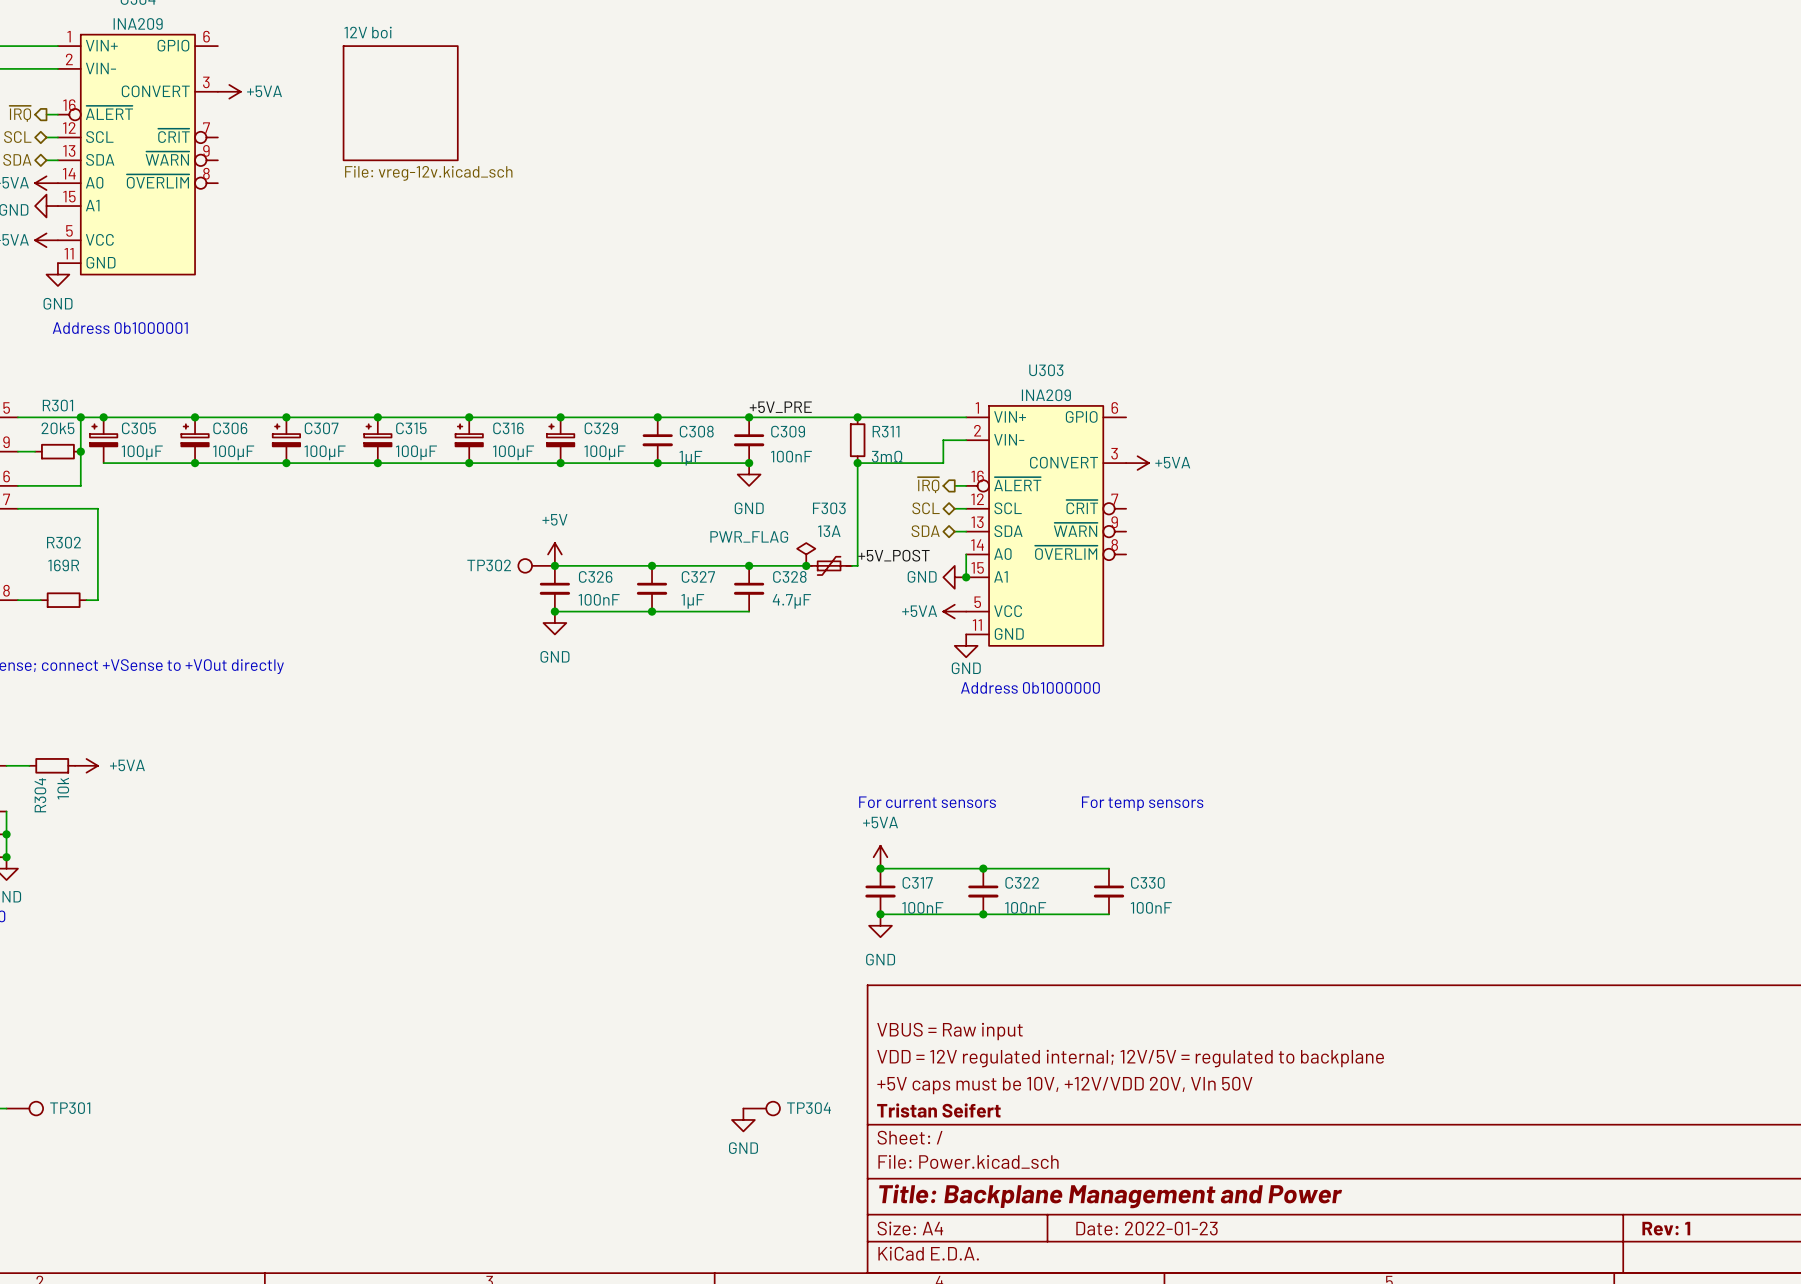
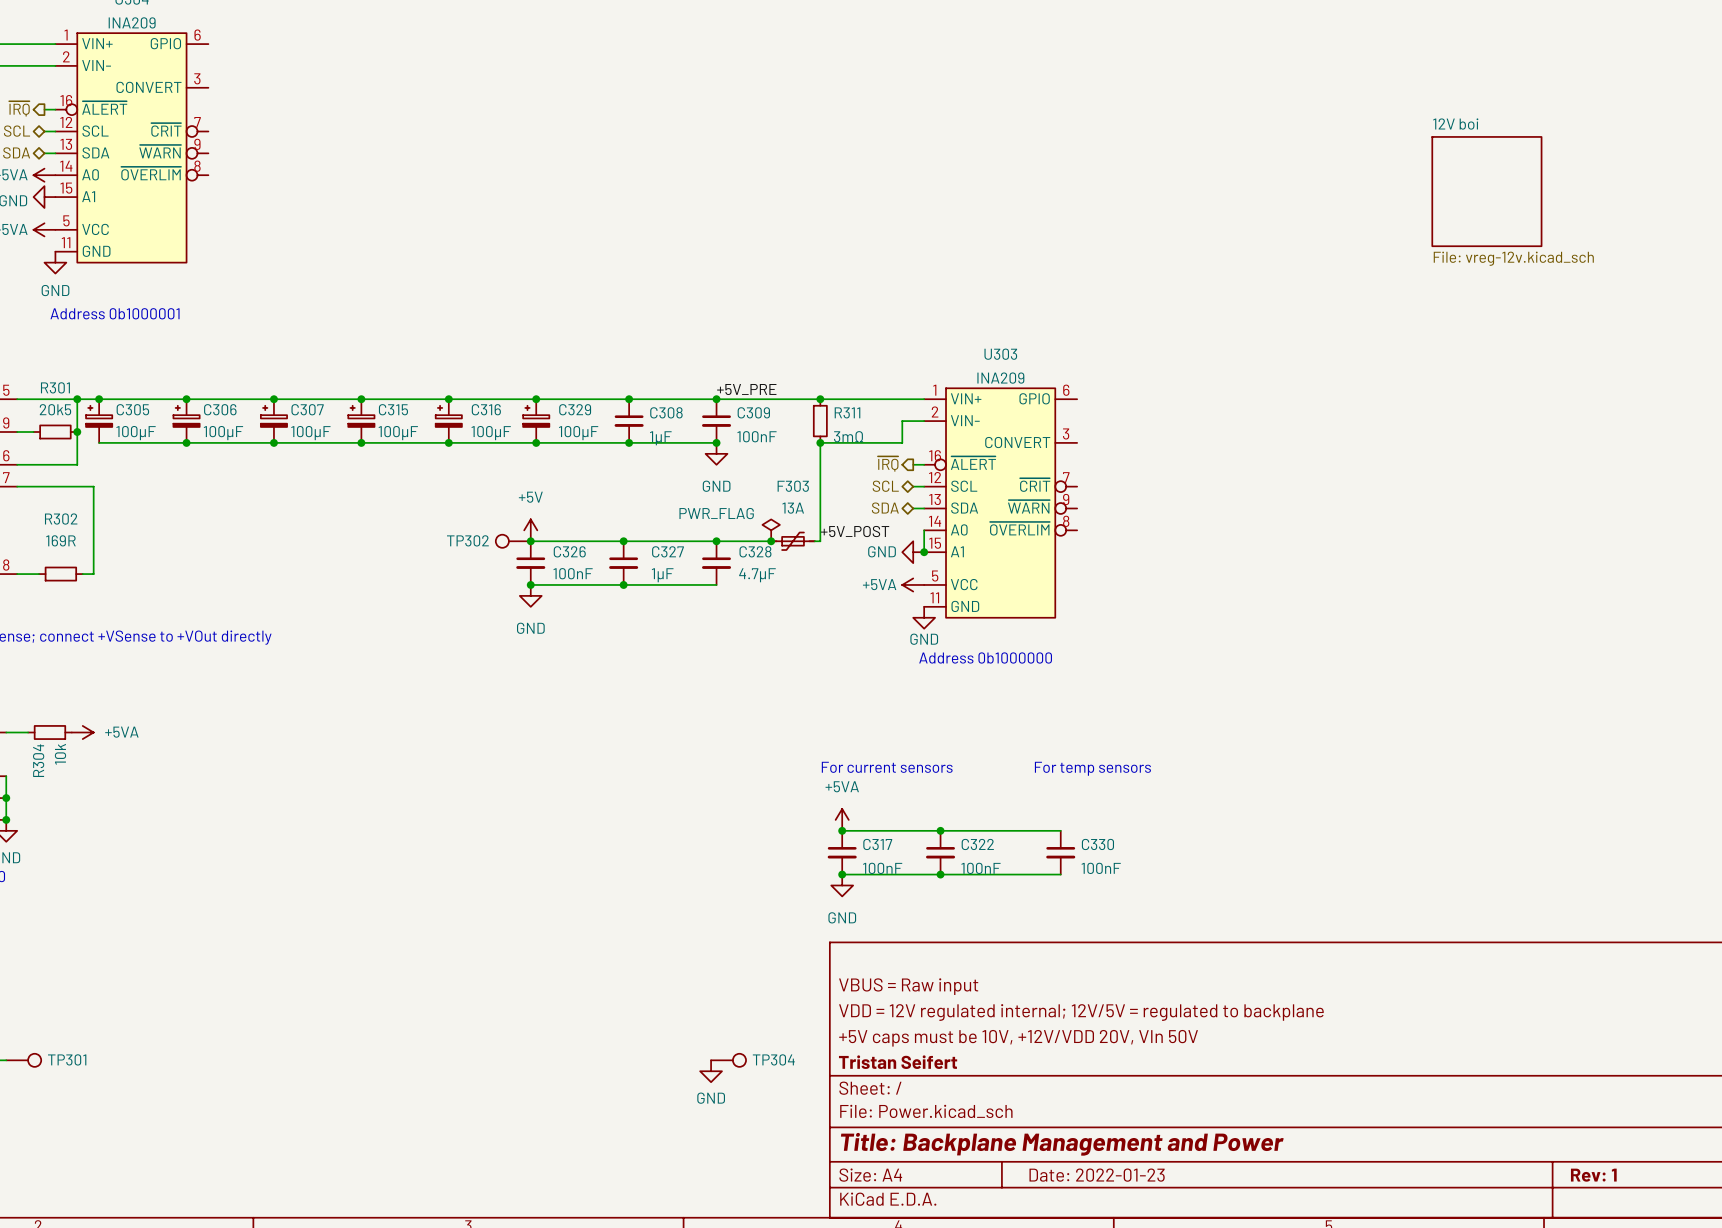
power symbol: +5VA (229, 91) -> none
sheet 12V boi position: (400, 103) -> (1486, 191)
power symbol: +5VA (1137, 463) -> none

